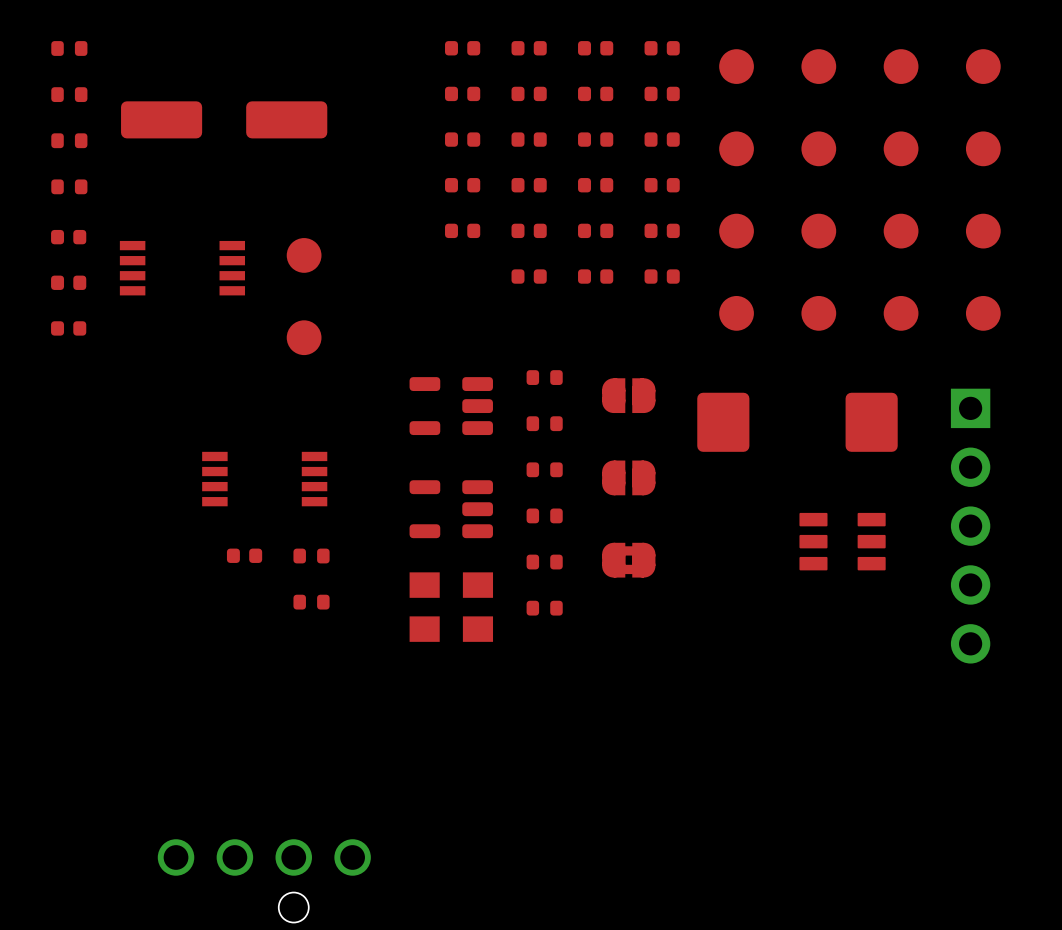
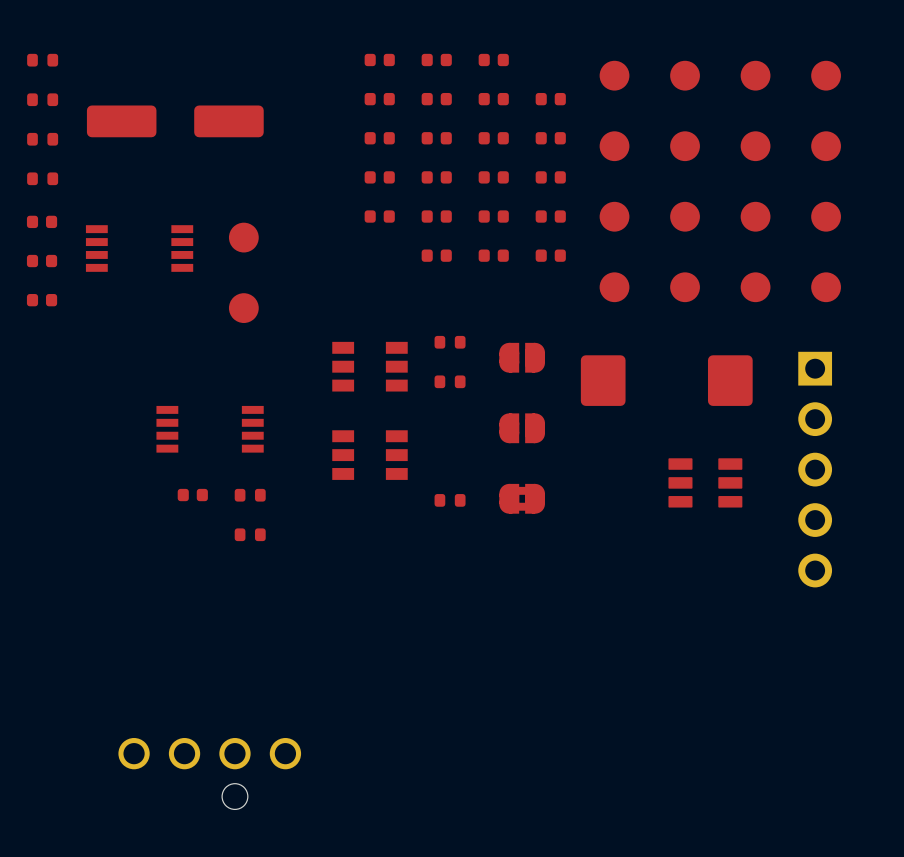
part: (662, 48) -> none
part footprint: [409, 377, 493, 436] -> [332, 341, 408, 392]
part: (544, 469) -> none
part footprint: [409, 480, 493, 539] -> [332, 430, 408, 480]
part: (544, 515) -> none
part: (451, 607) -> none
part: (544, 608) -> none

